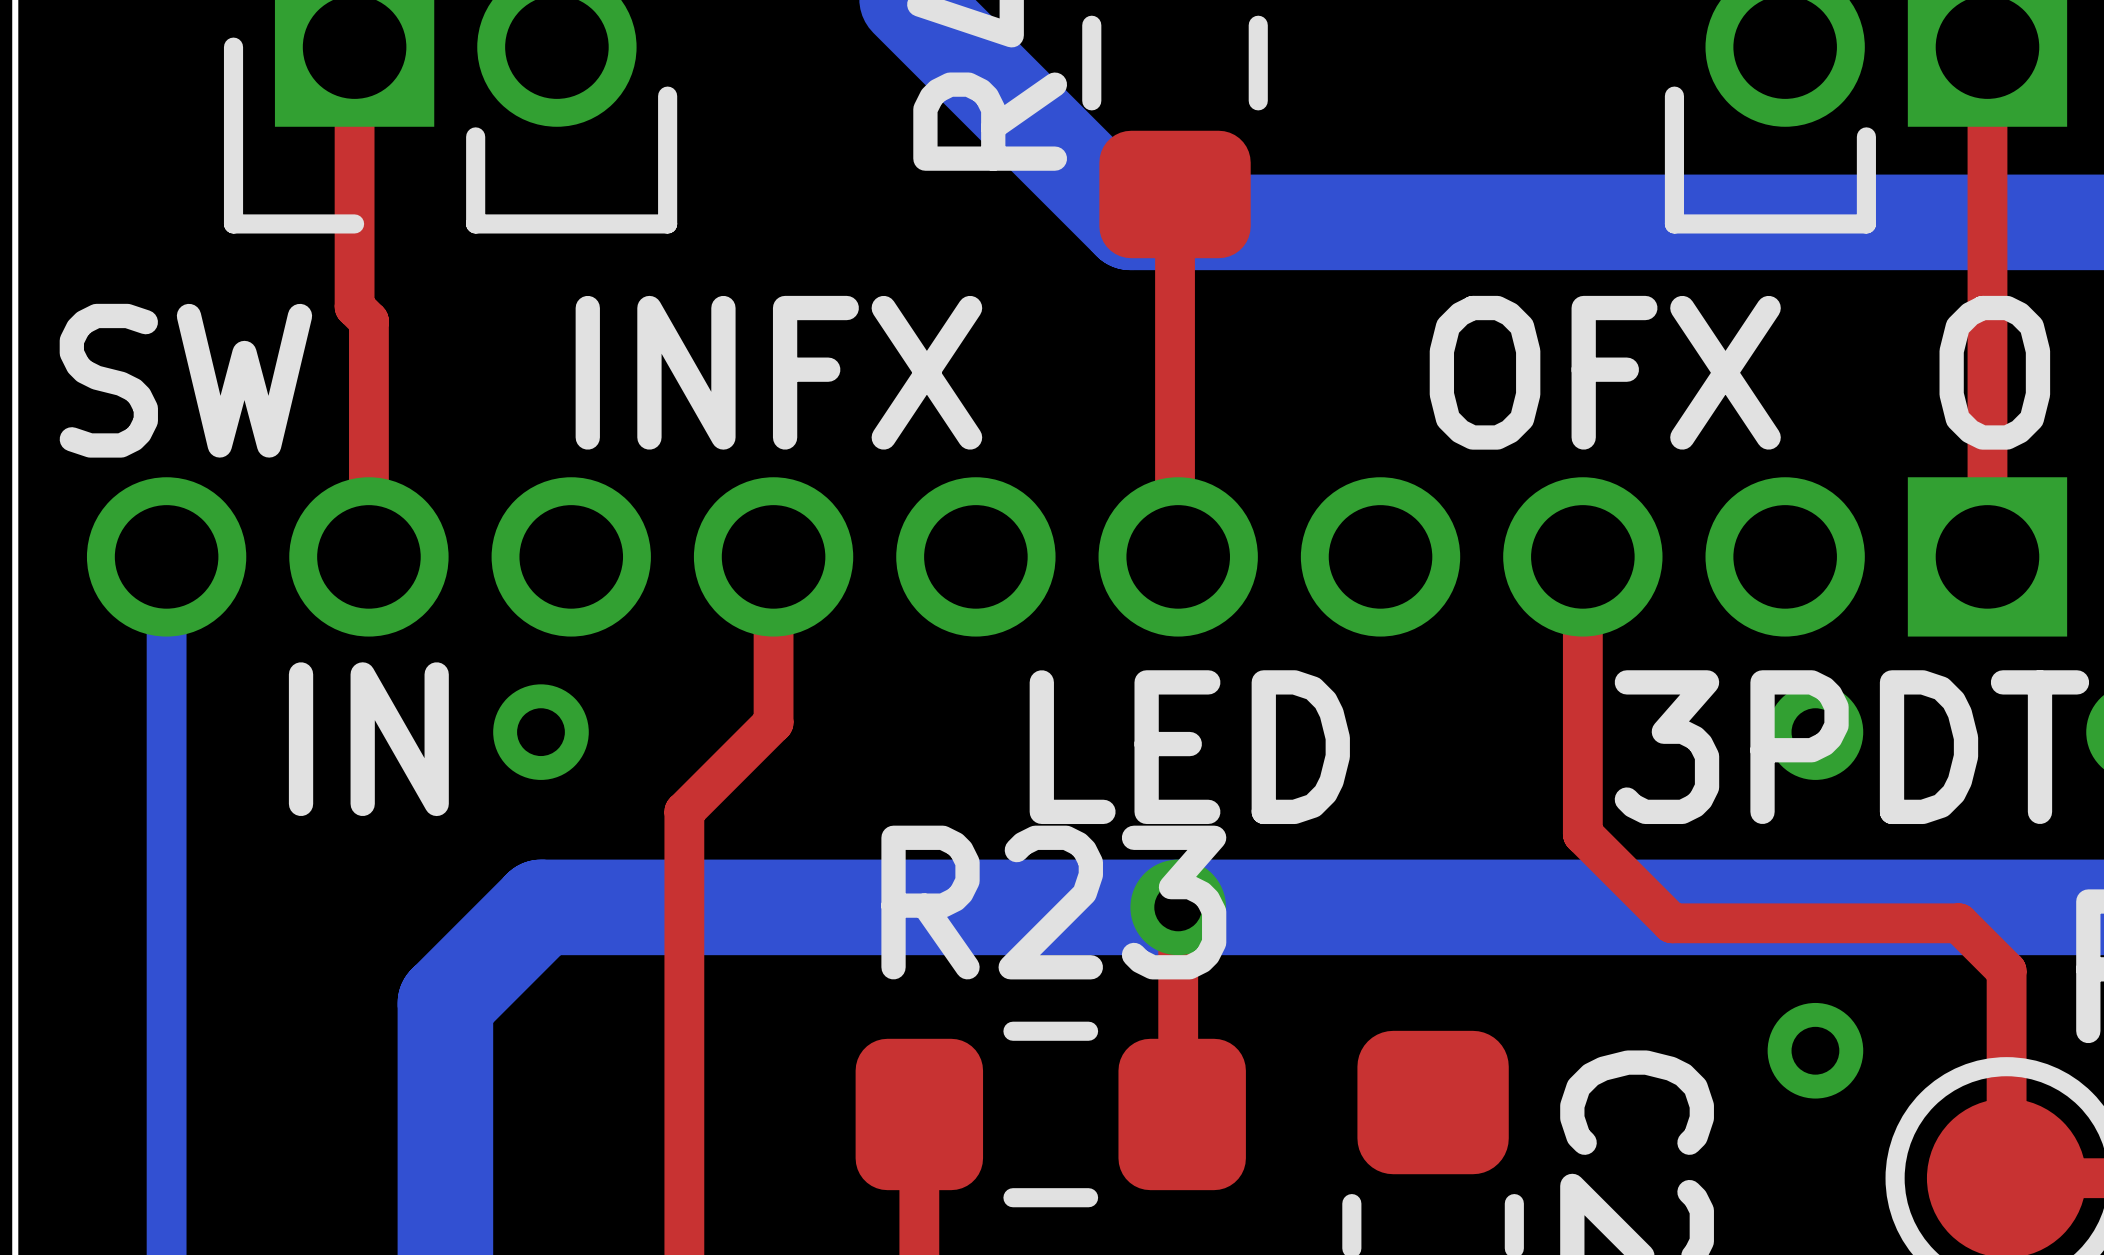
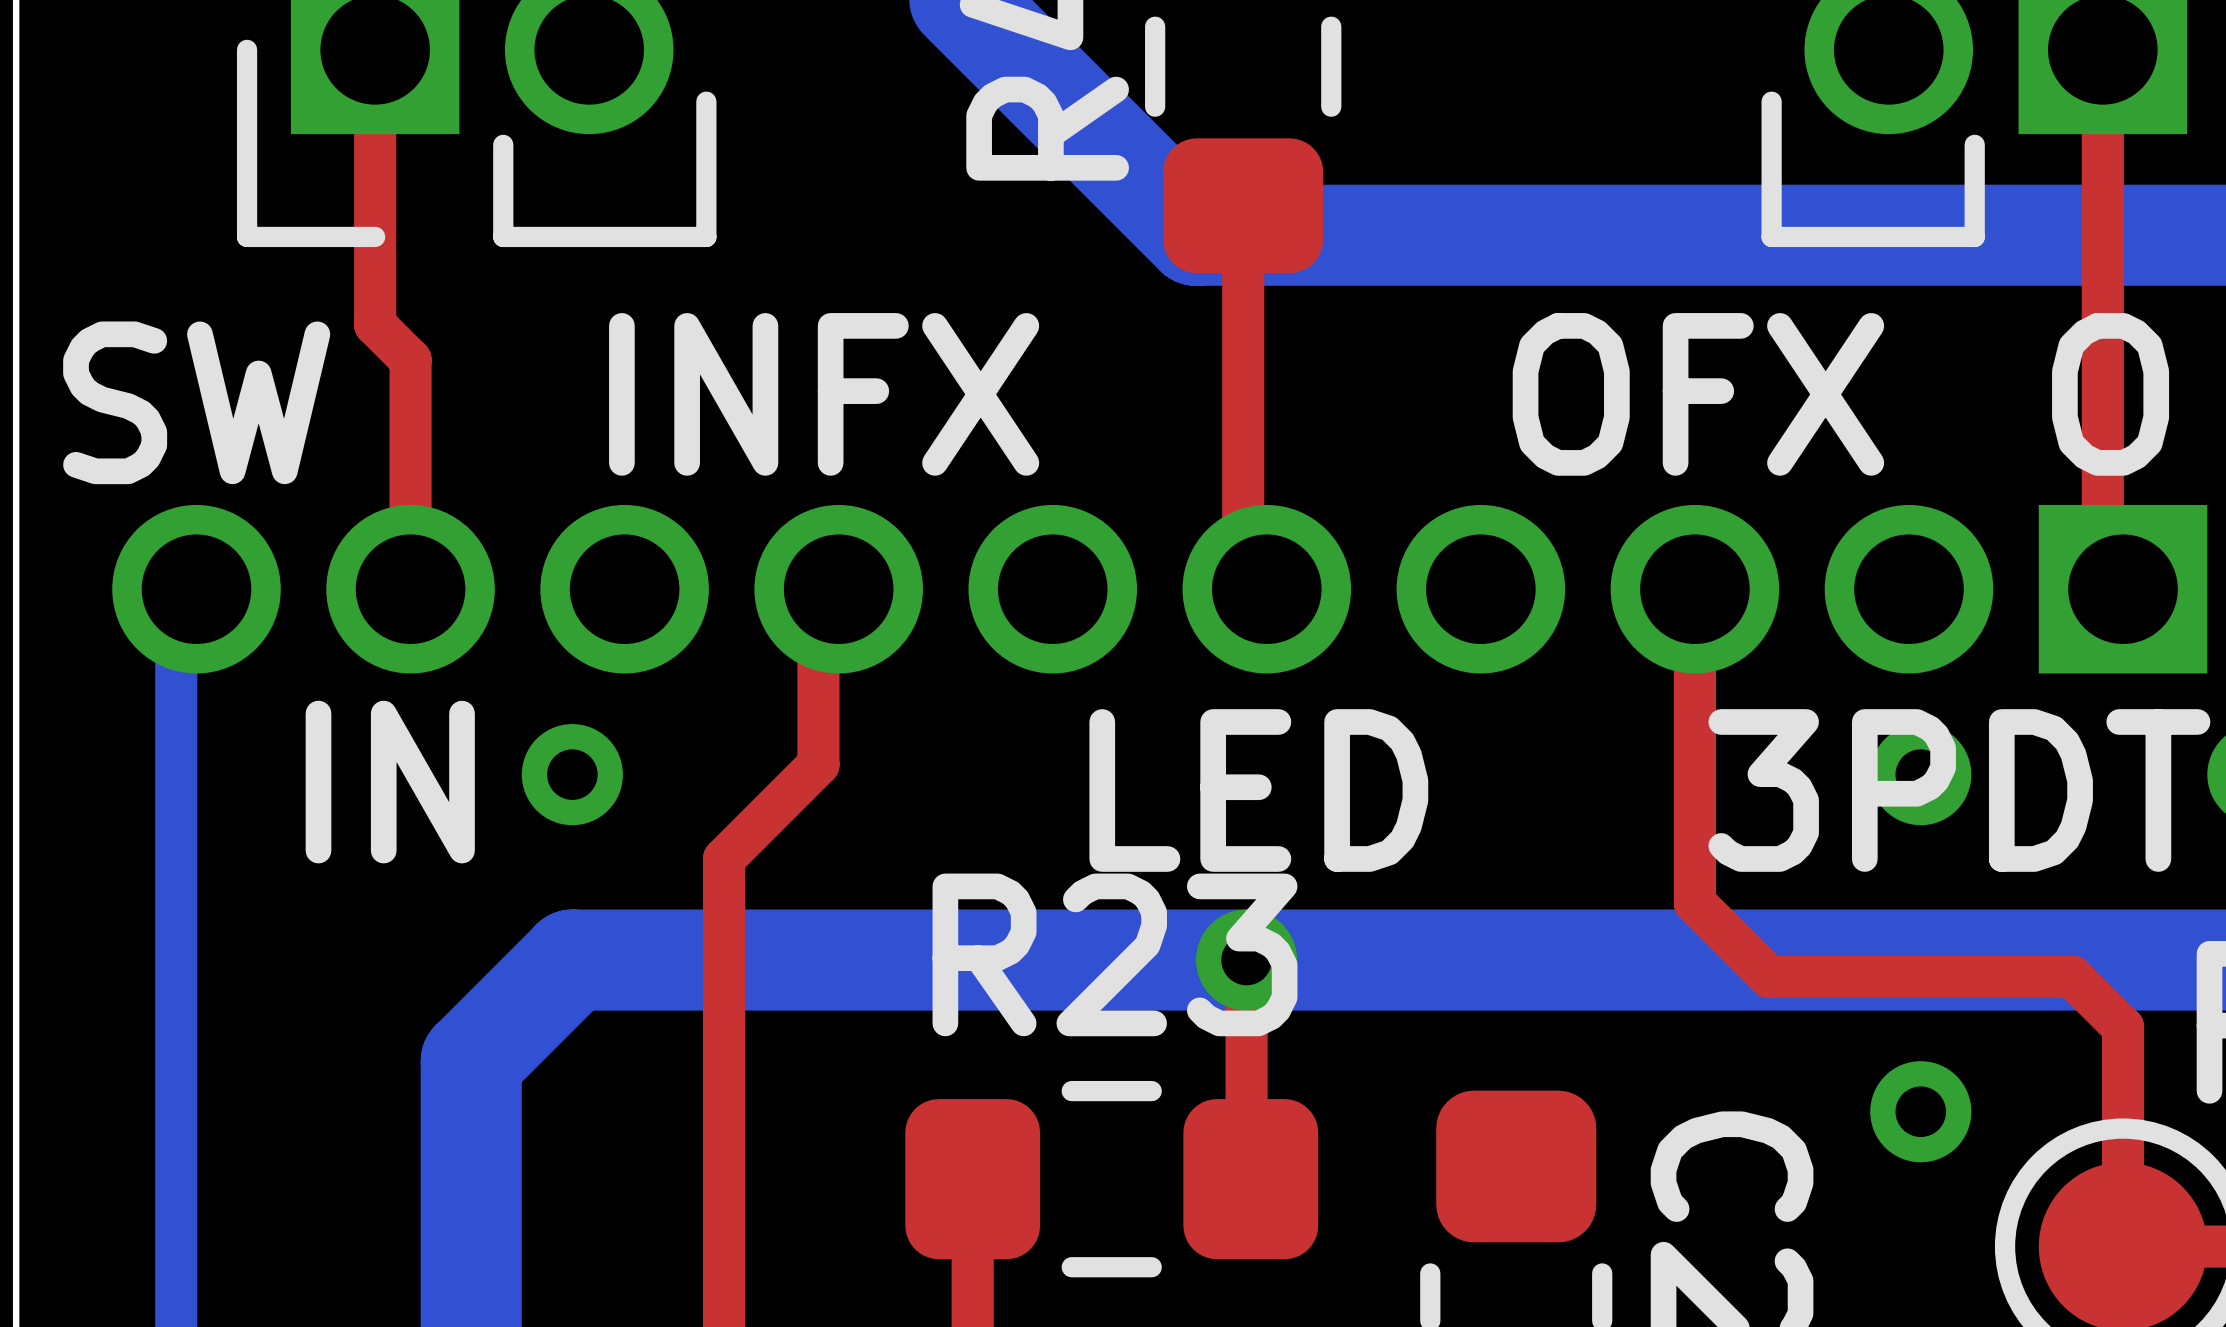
top track: (368, 321) (368, 556) -> (390, 339) (410, 359) (410, 589)
part position: (1077, 556) -> (1159, 589)
top track: (1582, 556) (1582, 834) (1601, 853) -> (1694, 589) (1694, 902)

